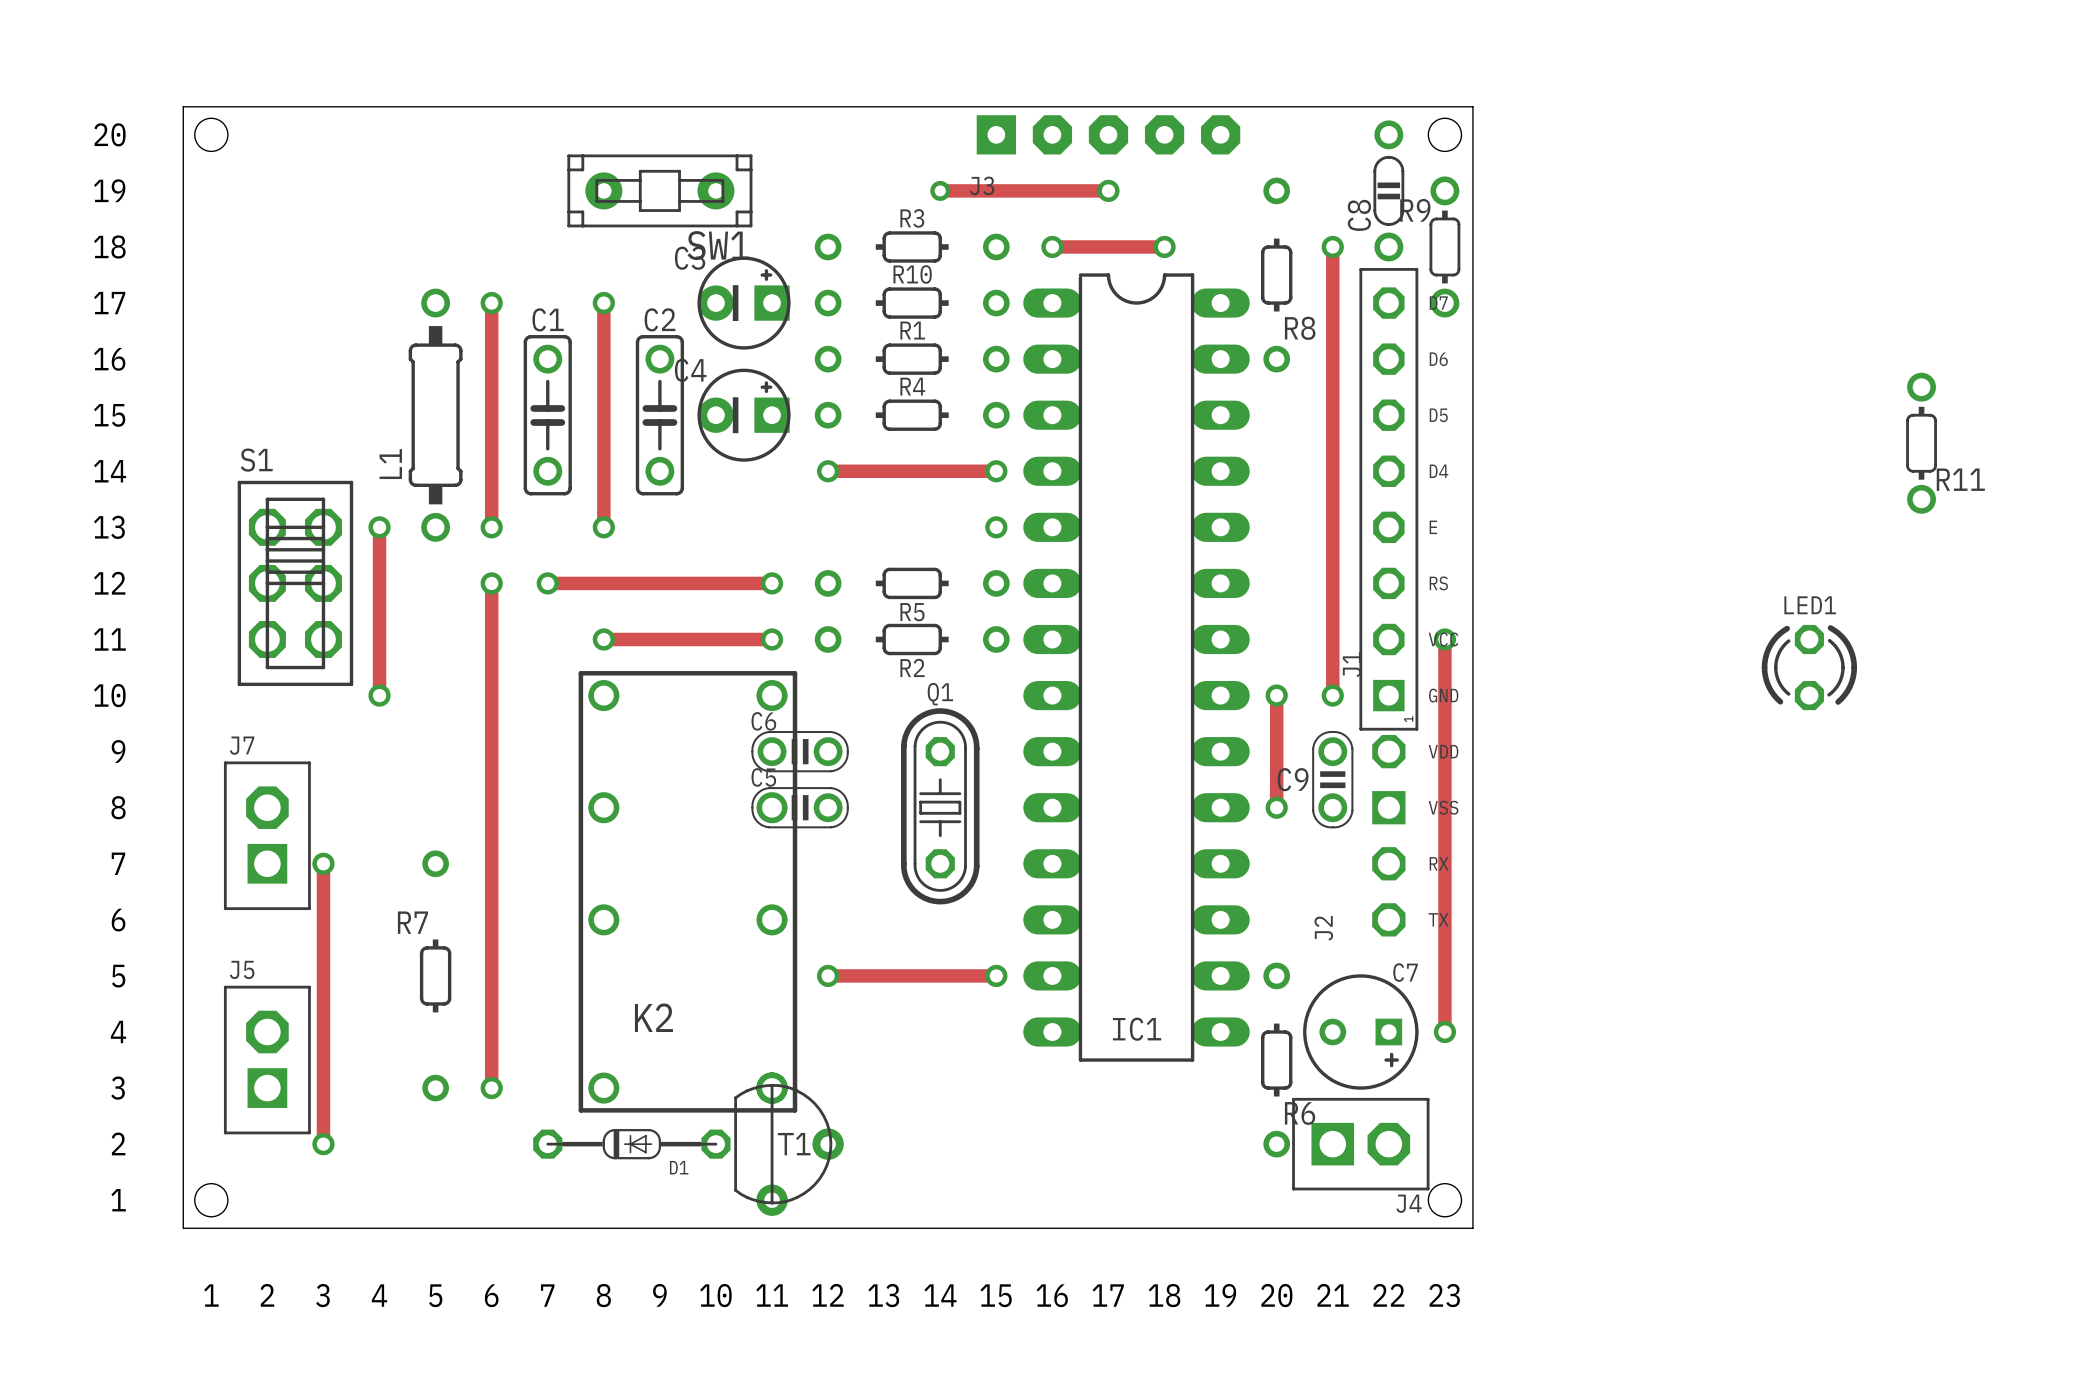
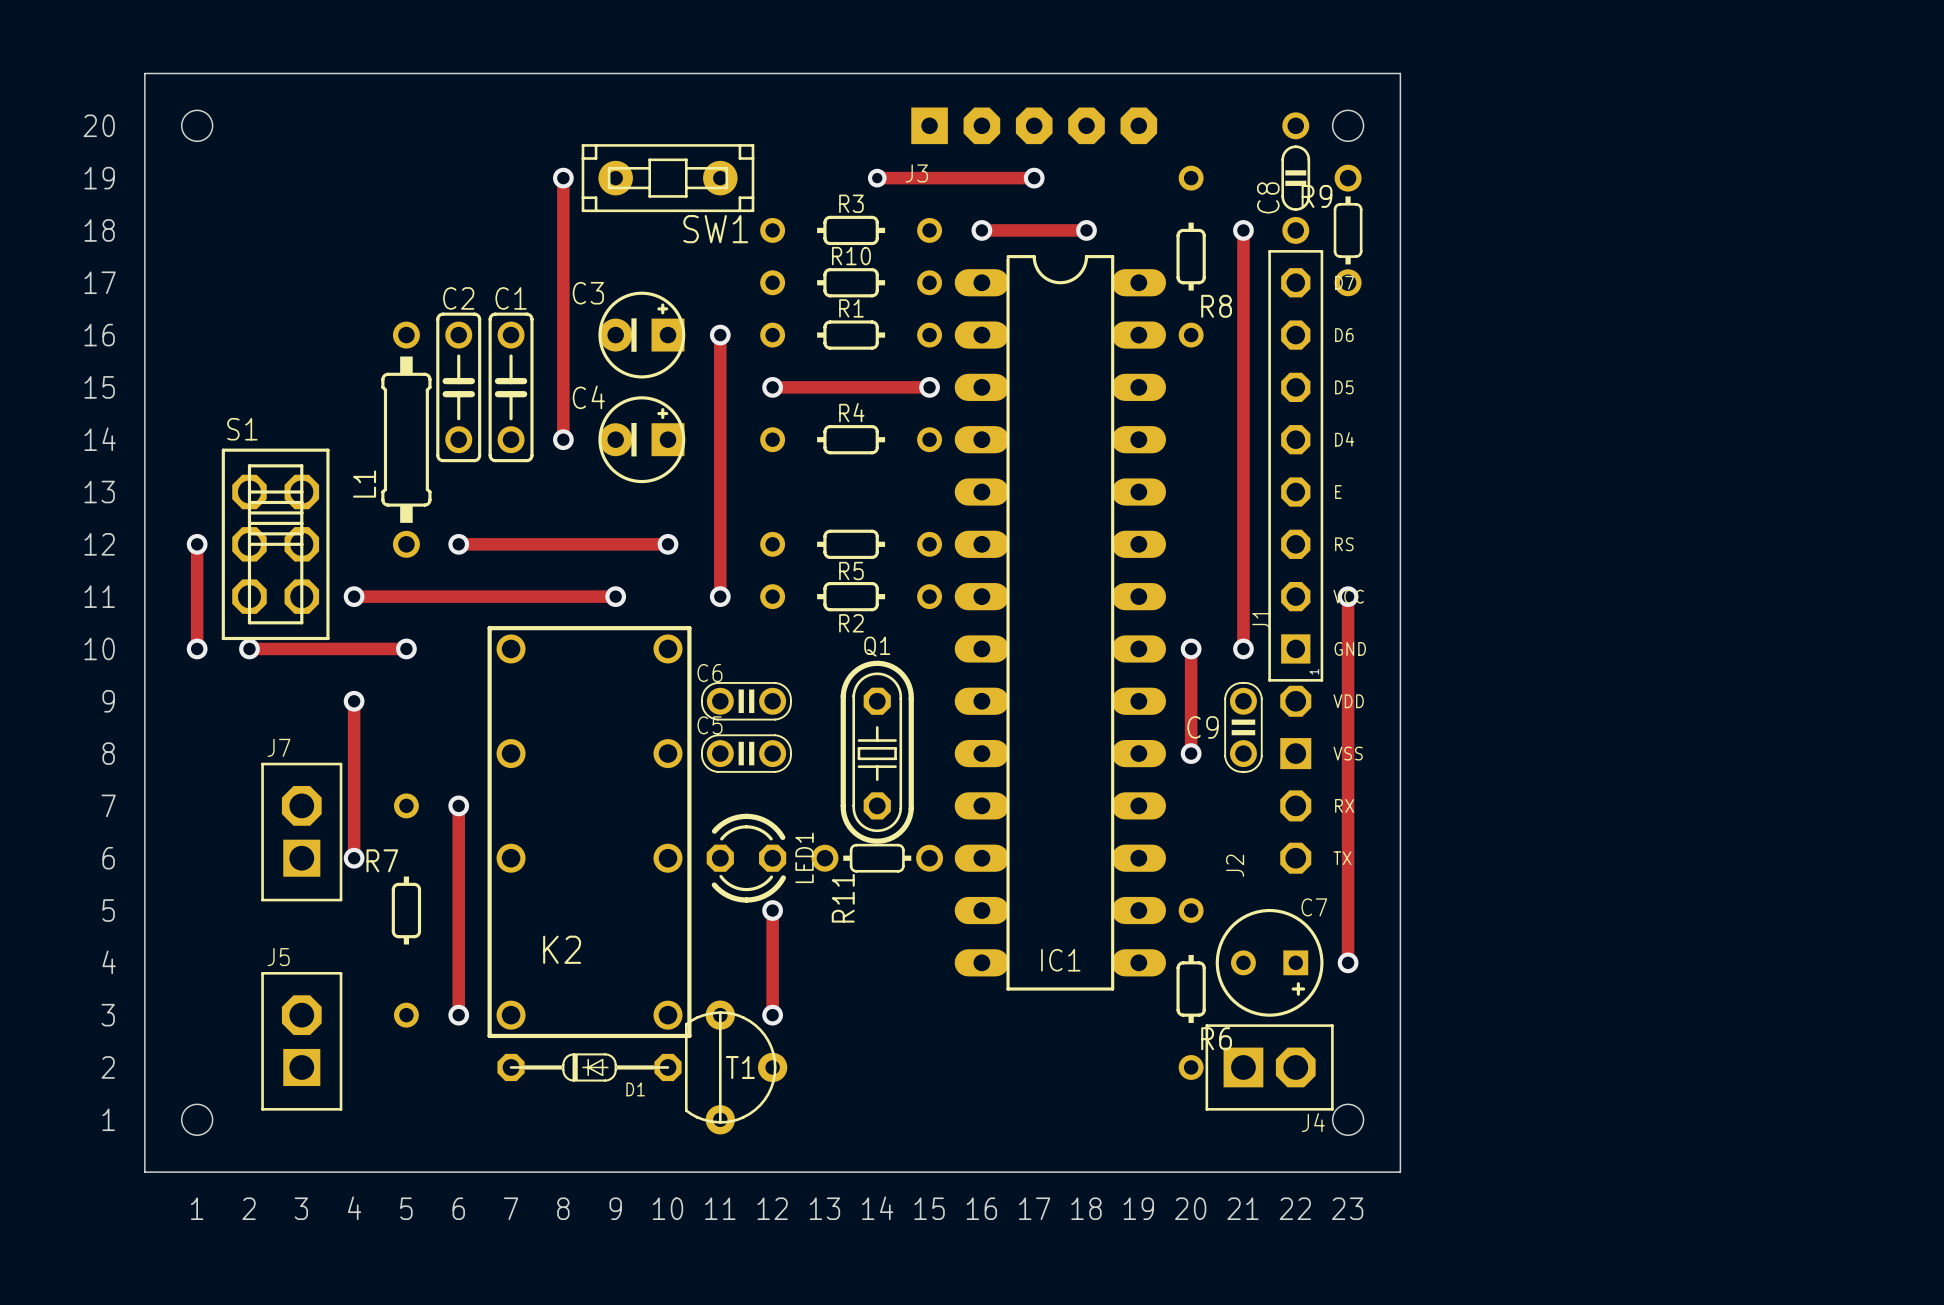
board edge: (183, 106) (1472, 106) (1472, 1228) (183, 1228) (183, 106) -> (144, 73) (144, 1172) (1400, 1172) (1400, 73) (144, 73)
track: none -> (563, 178) (563, 282)
via: none -> (563, 178)
SW1 position: (659, 190) -> (667, 178)
track: (491, 303) (491, 527) -> none
via: (491, 303) -> none
via: (603, 303) -> none
C3 position: (744, 303) -> (641, 335)
via: none -> (720, 335)
L1 position: (435, 415) -> (406, 439)
C2 position: (659, 415) -> (458, 387)
C4 position: (744, 415) -> (641, 439)
via: none -> (772, 387)
R4 position: (912, 415) -> (851, 439)
via: none -> (929, 387)
R11 rotation: 0° (1921, 443) -> 90° clockwise (877, 858)
R11 position: (1921, 443) -> (877, 858)
track: (603, 471) (603, 527) -> none
track: (828, 471) (996, 471) -> (772, 387) (929, 387)
via: (828, 471) -> none
via: (996, 471) -> none
track: (379, 527) (379, 695) -> (354, 701) (354, 858)
via: (379, 527) -> none
via: (491, 527) -> none
via position: (603, 527) -> (563, 439)
via: (996, 527) -> none
track: none -> (197, 544) (197, 648)
via: none -> (197, 544)
track: (491, 583) (491, 863) -> (458, 544) (511, 544)
via: (547, 583) -> none
track: (715, 583) (772, 583) -> none
via position: (772, 583) -> (667, 544)
track: none -> (354, 596) (563, 596)
via: none -> (354, 596)
via position: (603, 639) -> (615, 596)
track: (659, 639) (772, 639) -> (720, 335) (720, 596)
LED1 rotation: 0° (1809, 667) -> 90° clockwise (746, 858)
LED1 position: (1809, 667) -> (746, 858)
via: none -> (197, 648)
track: none -> (249, 648) (406, 648)
via: none -> (249, 648)
via: (379, 695) -> none
via: none -> (406, 648)
via: none -> (354, 701)
J7 position: (267, 835) -> (301, 832)
track: (323, 863) (323, 1144) -> none
via: (323, 863) -> none
via: none -> (458, 805)
K2 position: (687, 891) -> (589, 832)
via: none -> (354, 858)
track: (828, 975) (996, 975) -> (772, 910) (772, 1015)
via: (996, 975) -> none
J5 position: (267, 1060) -> (301, 1041)
via: none -> (772, 1015)
via: (323, 1144) -> none

